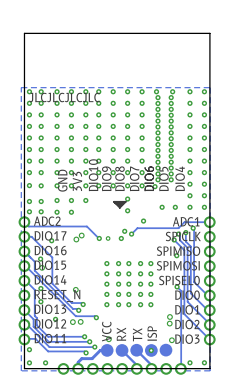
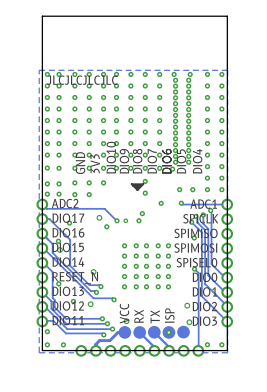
via: none -> (181, 203)
track: (184, 222) (178, 228) (137, 228) (131, 234) -> (202, 204) (181, 203)
via: (131, 234) -> none
via: (76, 239) -> none
via: none -> (106, 226)
via: (40, 288) -> none
via: (169, 317) -> none
via: (80, 321) -> none

